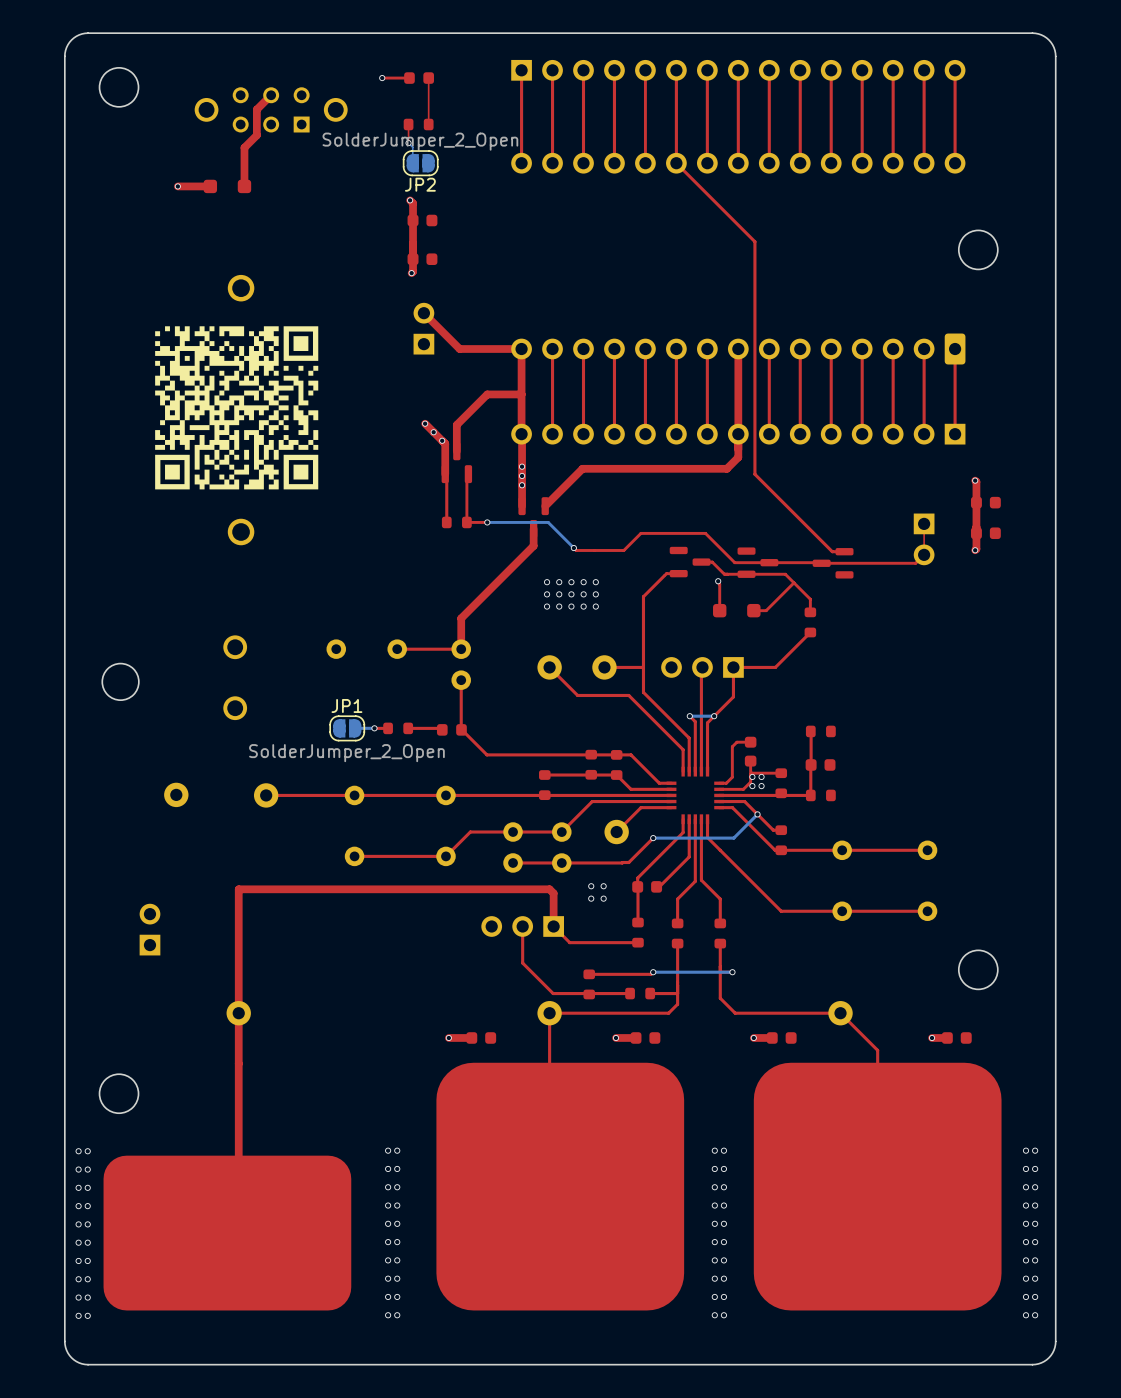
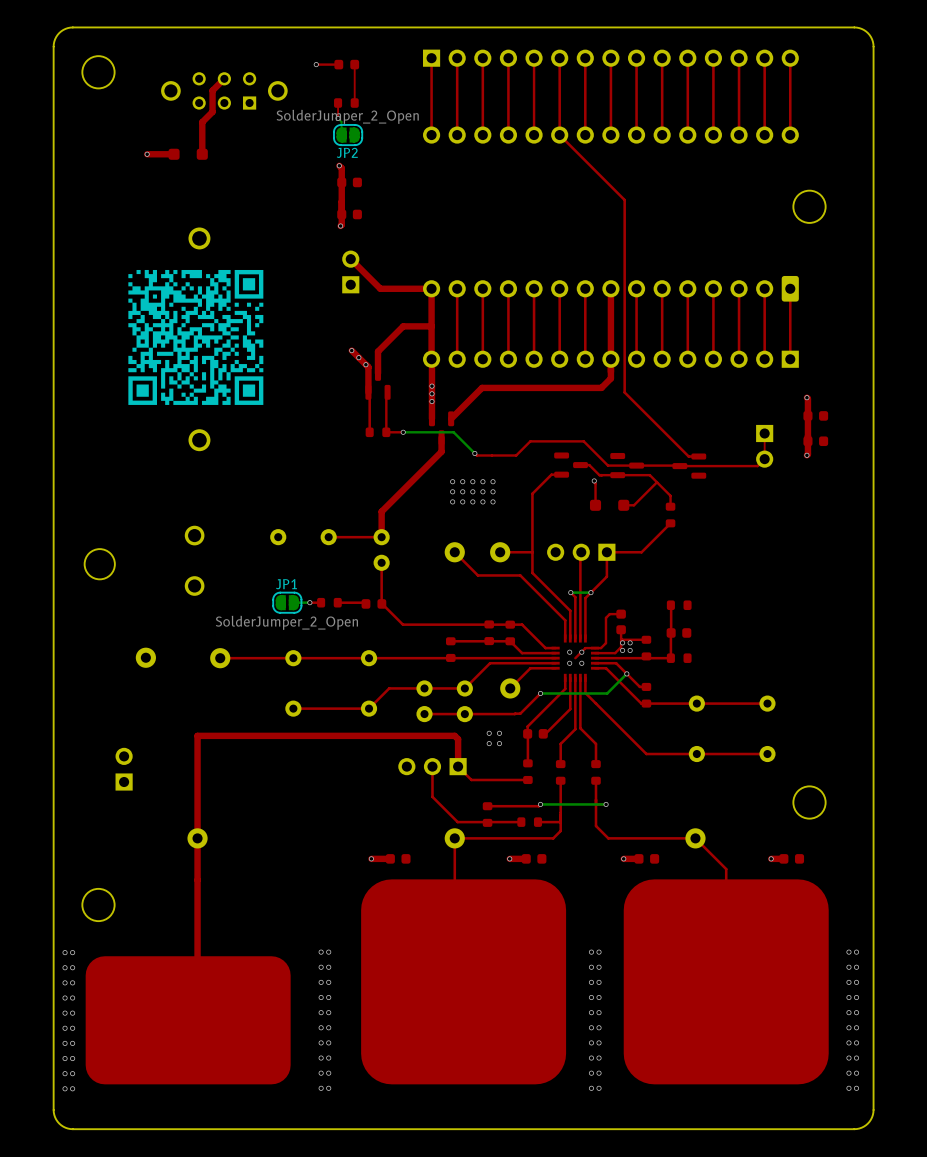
top track: none -> (595, 648) (585, 648) (575, 658)
via: none -> (569, 652)
via: none -> (581, 652)
via: none -> (569, 663)
via: none -> (581, 663)

